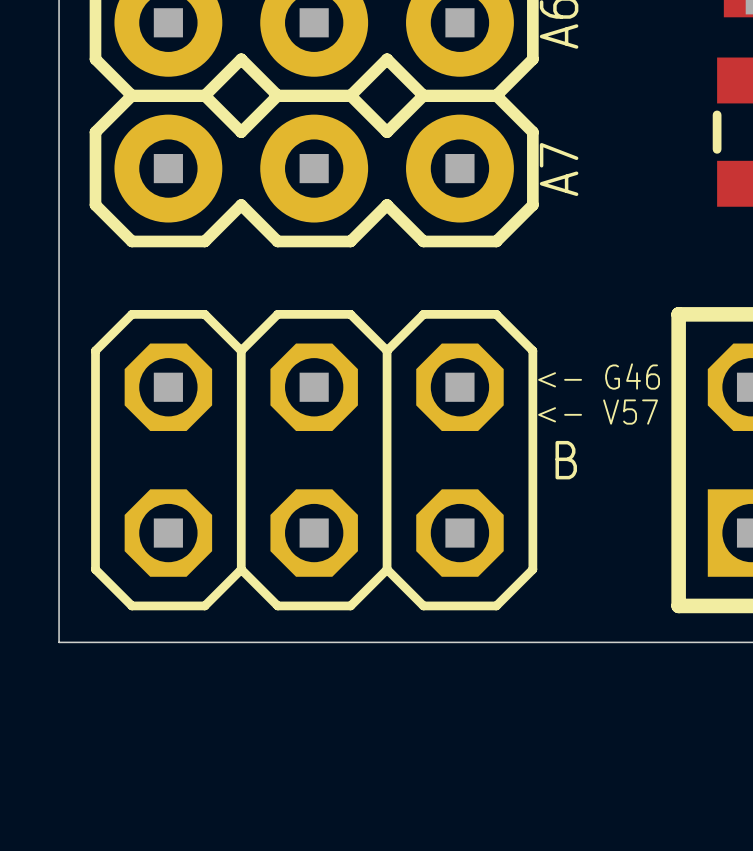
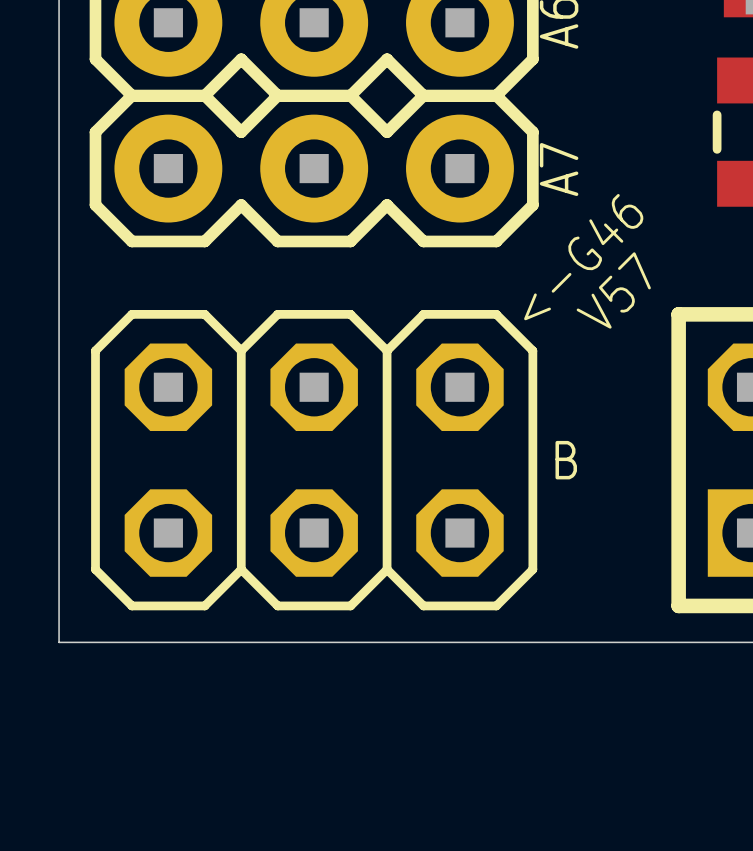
text: none -> <-G46 (583, 257)
text: none -> V57 (613, 290)
text: <- G46 (599, 376) -> none
text: <- V57 (598, 412) -> none

